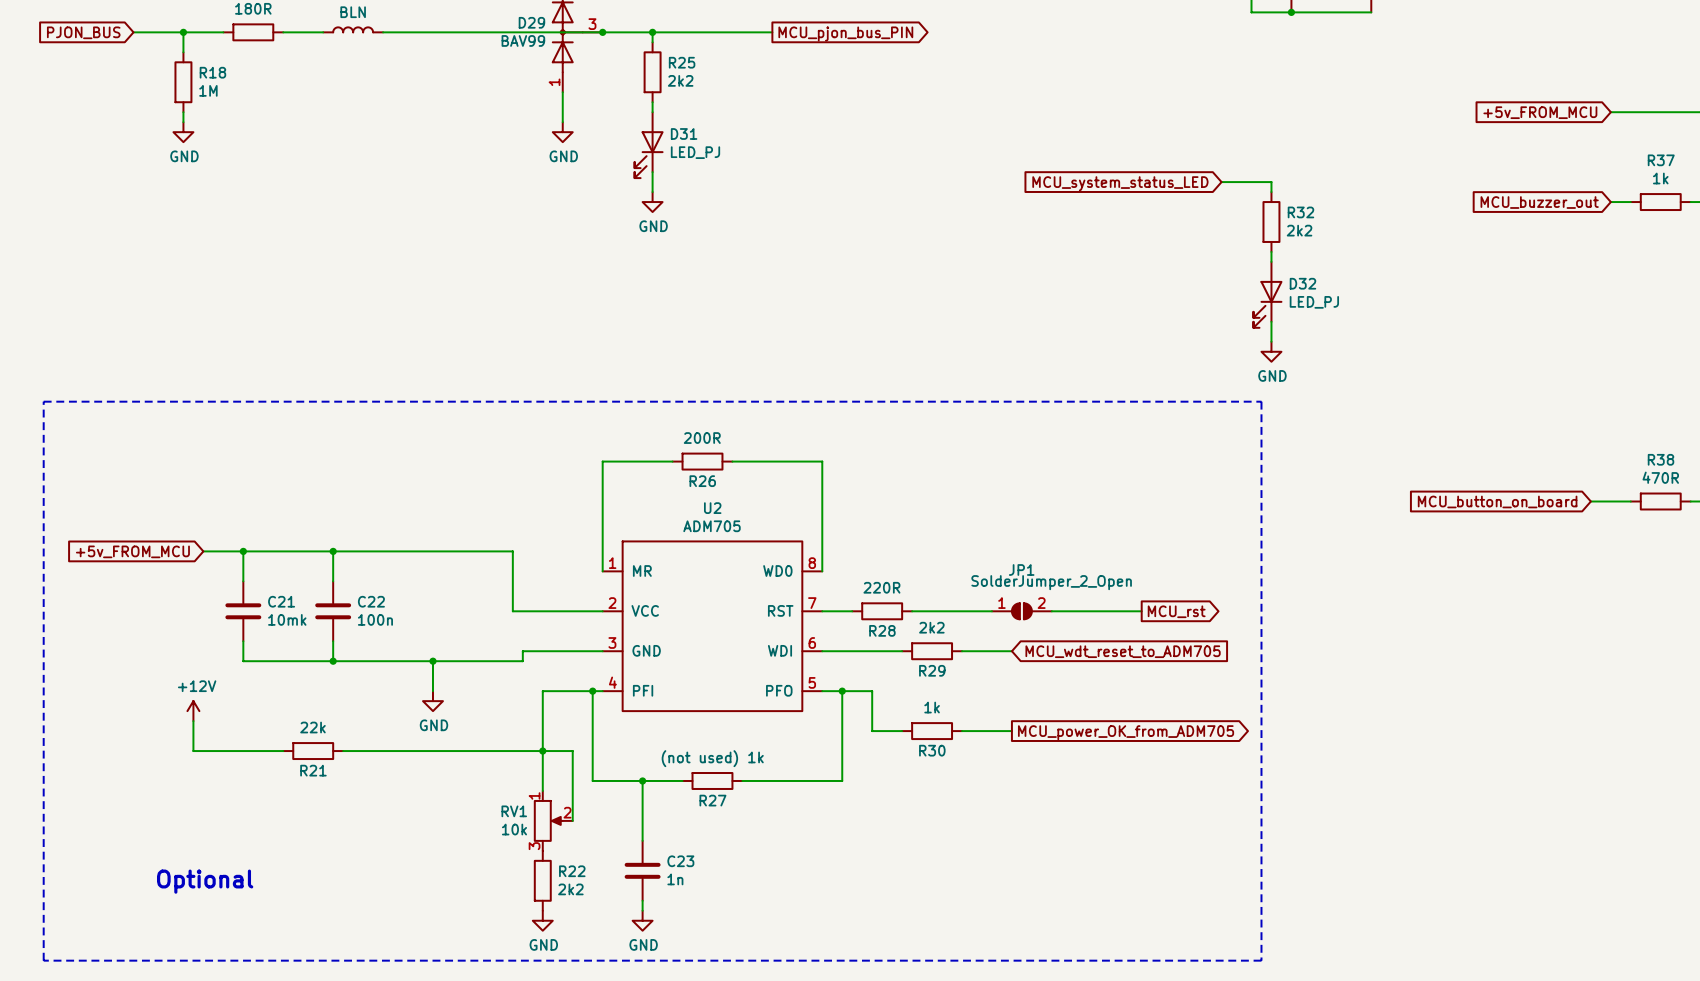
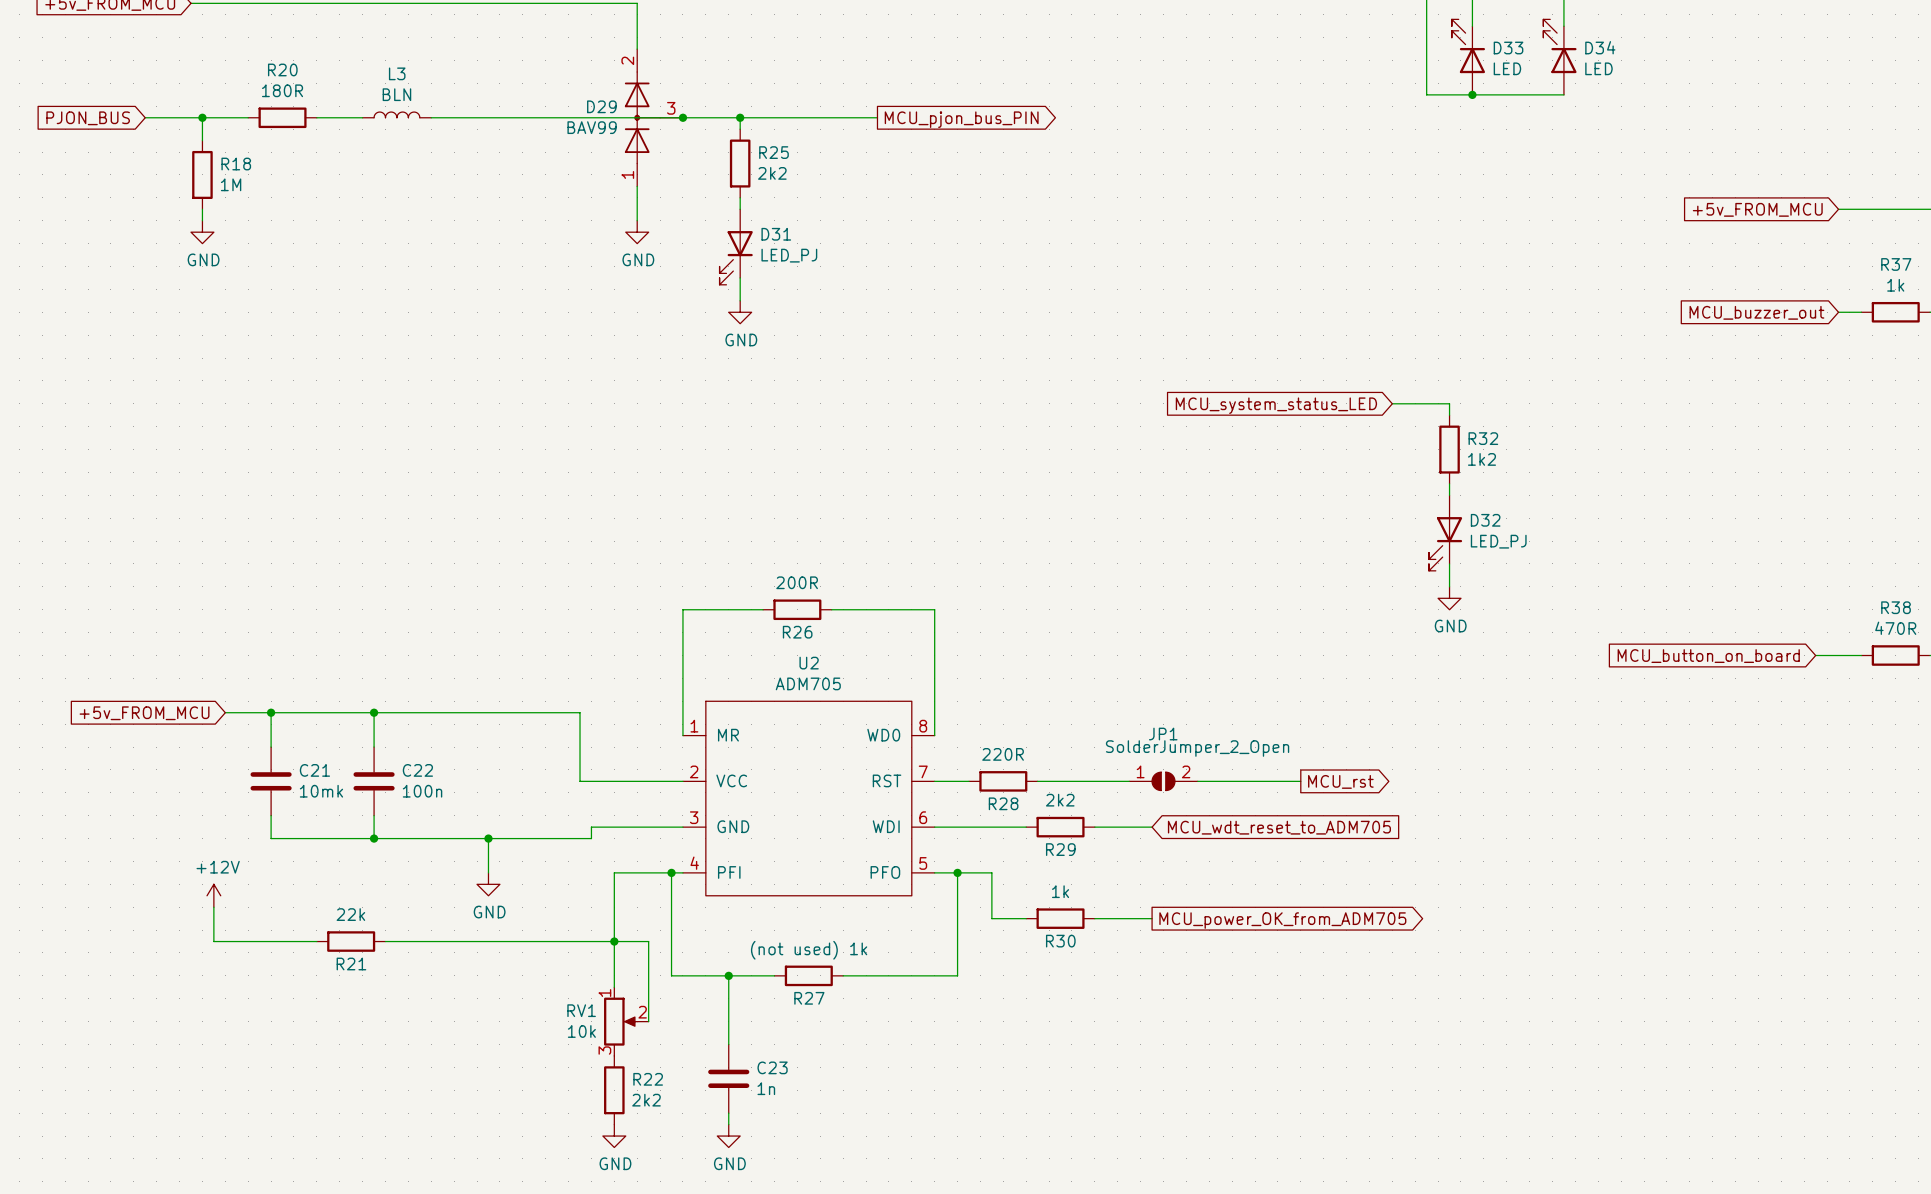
wire: (1221, 182) (1271, 182) (1271, 192) -> (1392, 403) (1449, 403) (1449, 415)
global label position: MCU_system_status_LED (1120, 183) -> MCU_system_status_LED (1276, 405)
R32 position: (1271, 222) -> (1449, 449)
R32 value: 2k2 (1299, 230) -> 1k2 (1481, 459)
wire: (1271, 251) (1271, 261) -> (1449, 483) (1449, 495)
D32 position: (1267, 294) -> (1445, 533)
wire: (1271, 321) (1271, 341) -> (1449, 563) (1449, 586)
power symbol position: GND (1271, 351) -> GND (1449, 598)
line: (43, 401) (43, 960) (1261, 960) (1261, 401) (43, 401) -> none
text: Optional (205, 881) -> none

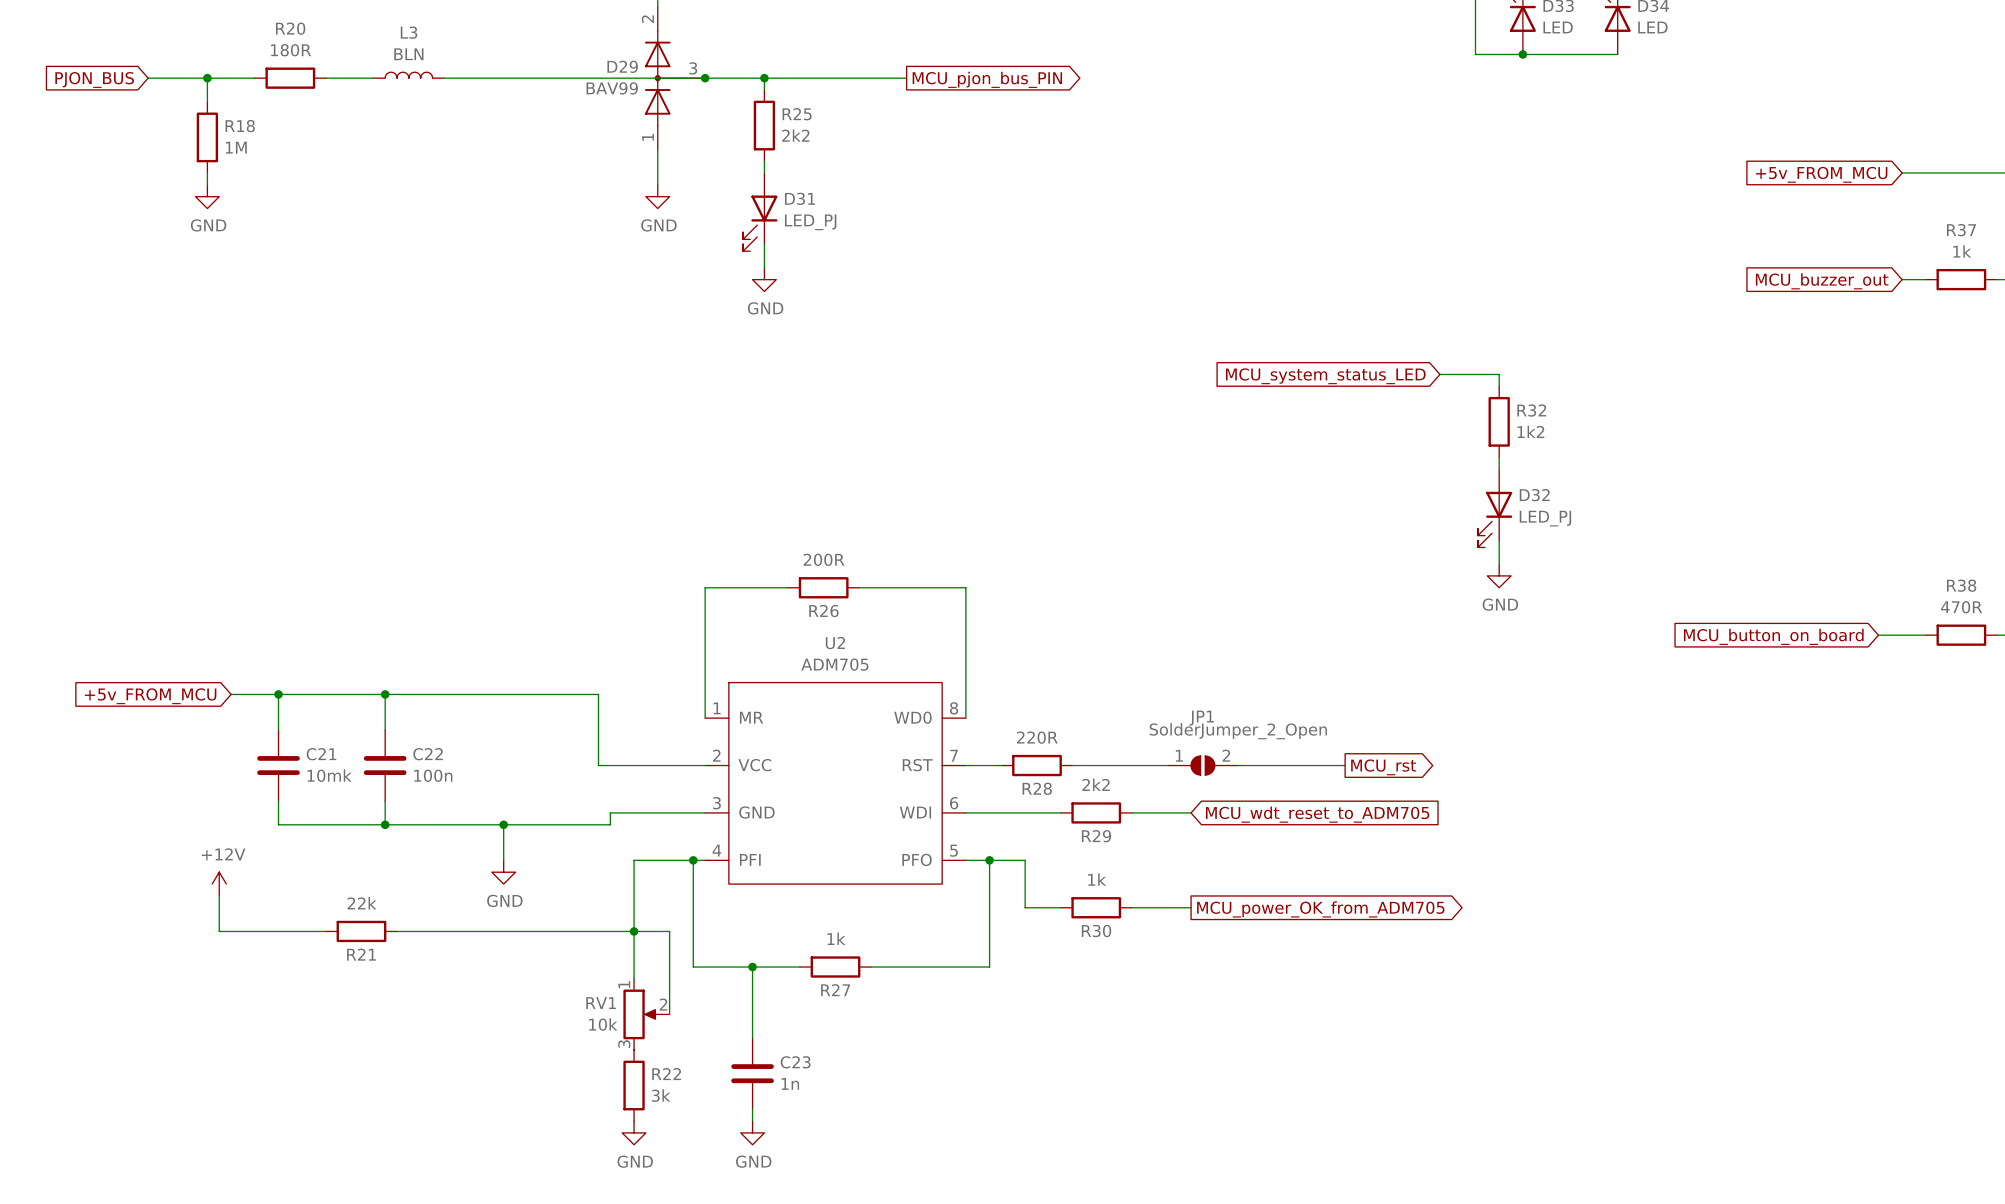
R27 value: (not used) 1k (809, 950) -> 1k (836, 938)
R22 value: 2k2 (646, 1100) -> 3k (661, 1095)

